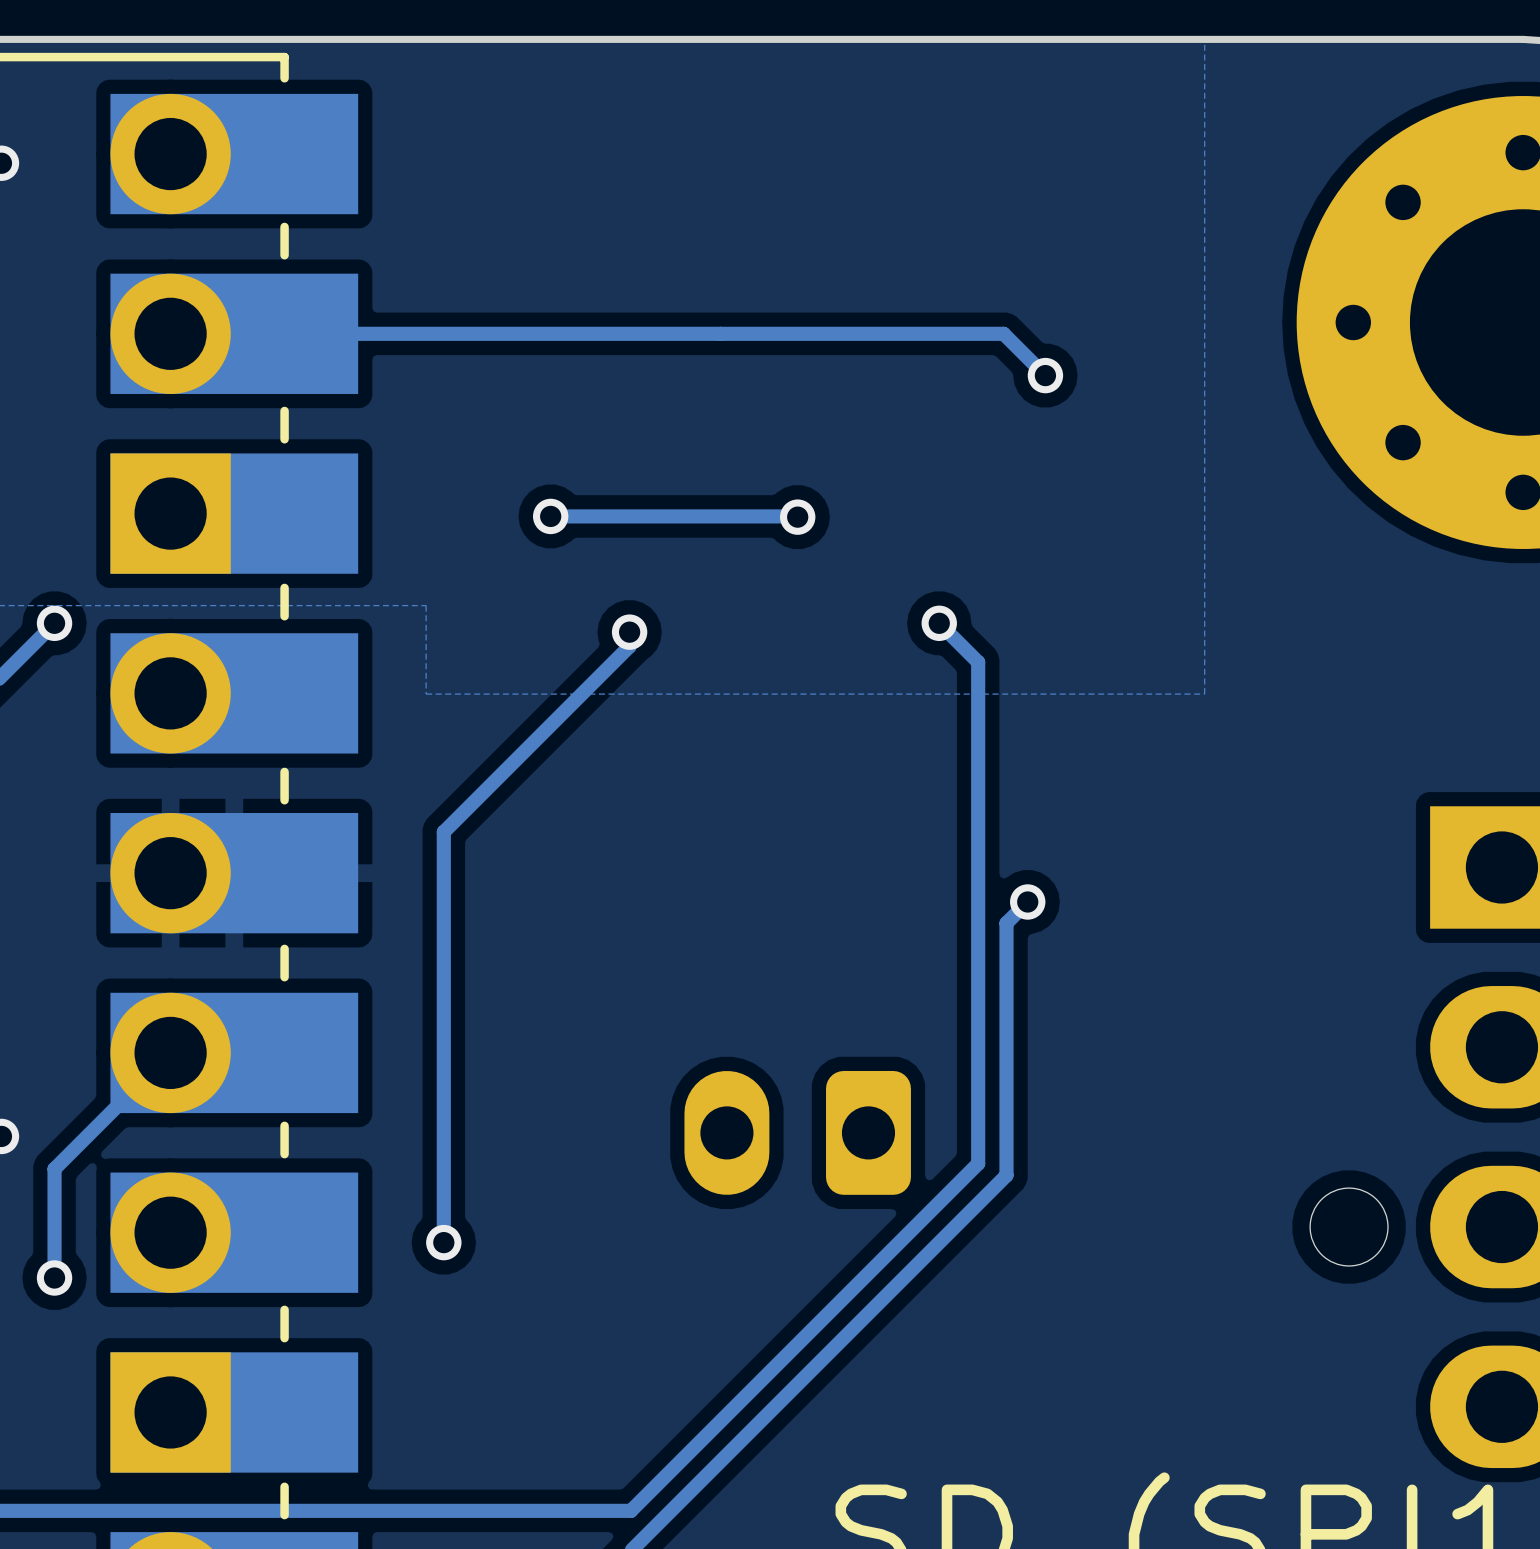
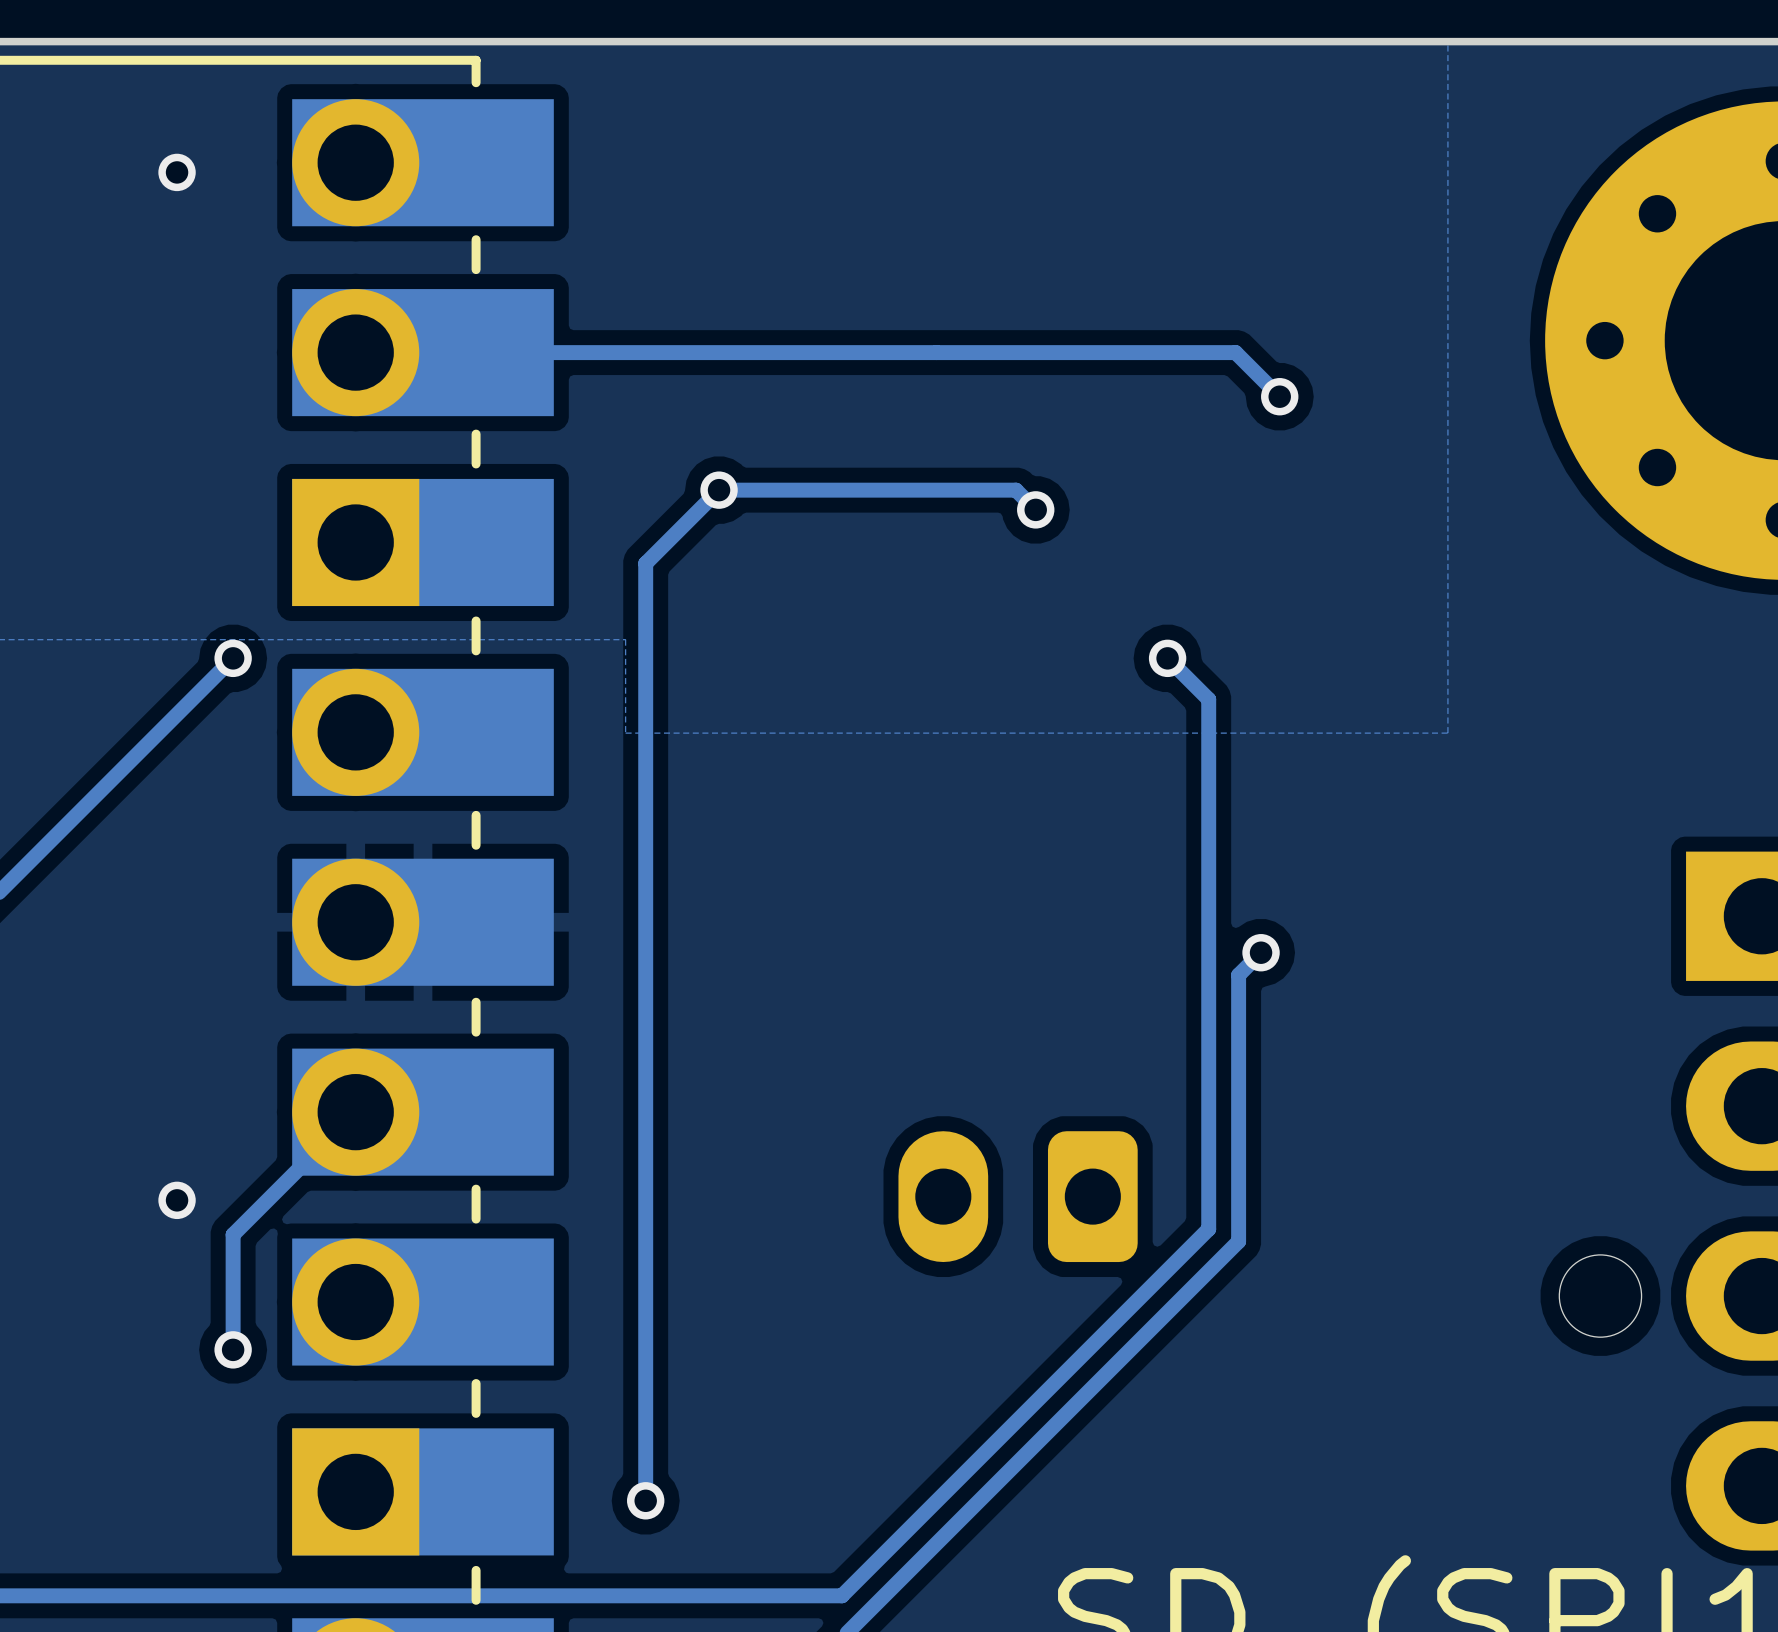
track: none -> (1035, 509) (1016, 490) (719, 490) (645, 563) (645, 1500)
via position: (550, 516) -> (719, 490)
track: (796, 516) (550, 516) -> none
via position: (797, 517) -> (1035, 509)
track: (629, 632) (629, 646) (443, 832) (443, 1242) -> none
via: (629, 632) -> none
via position: (443, 1242) -> (645, 1500)

